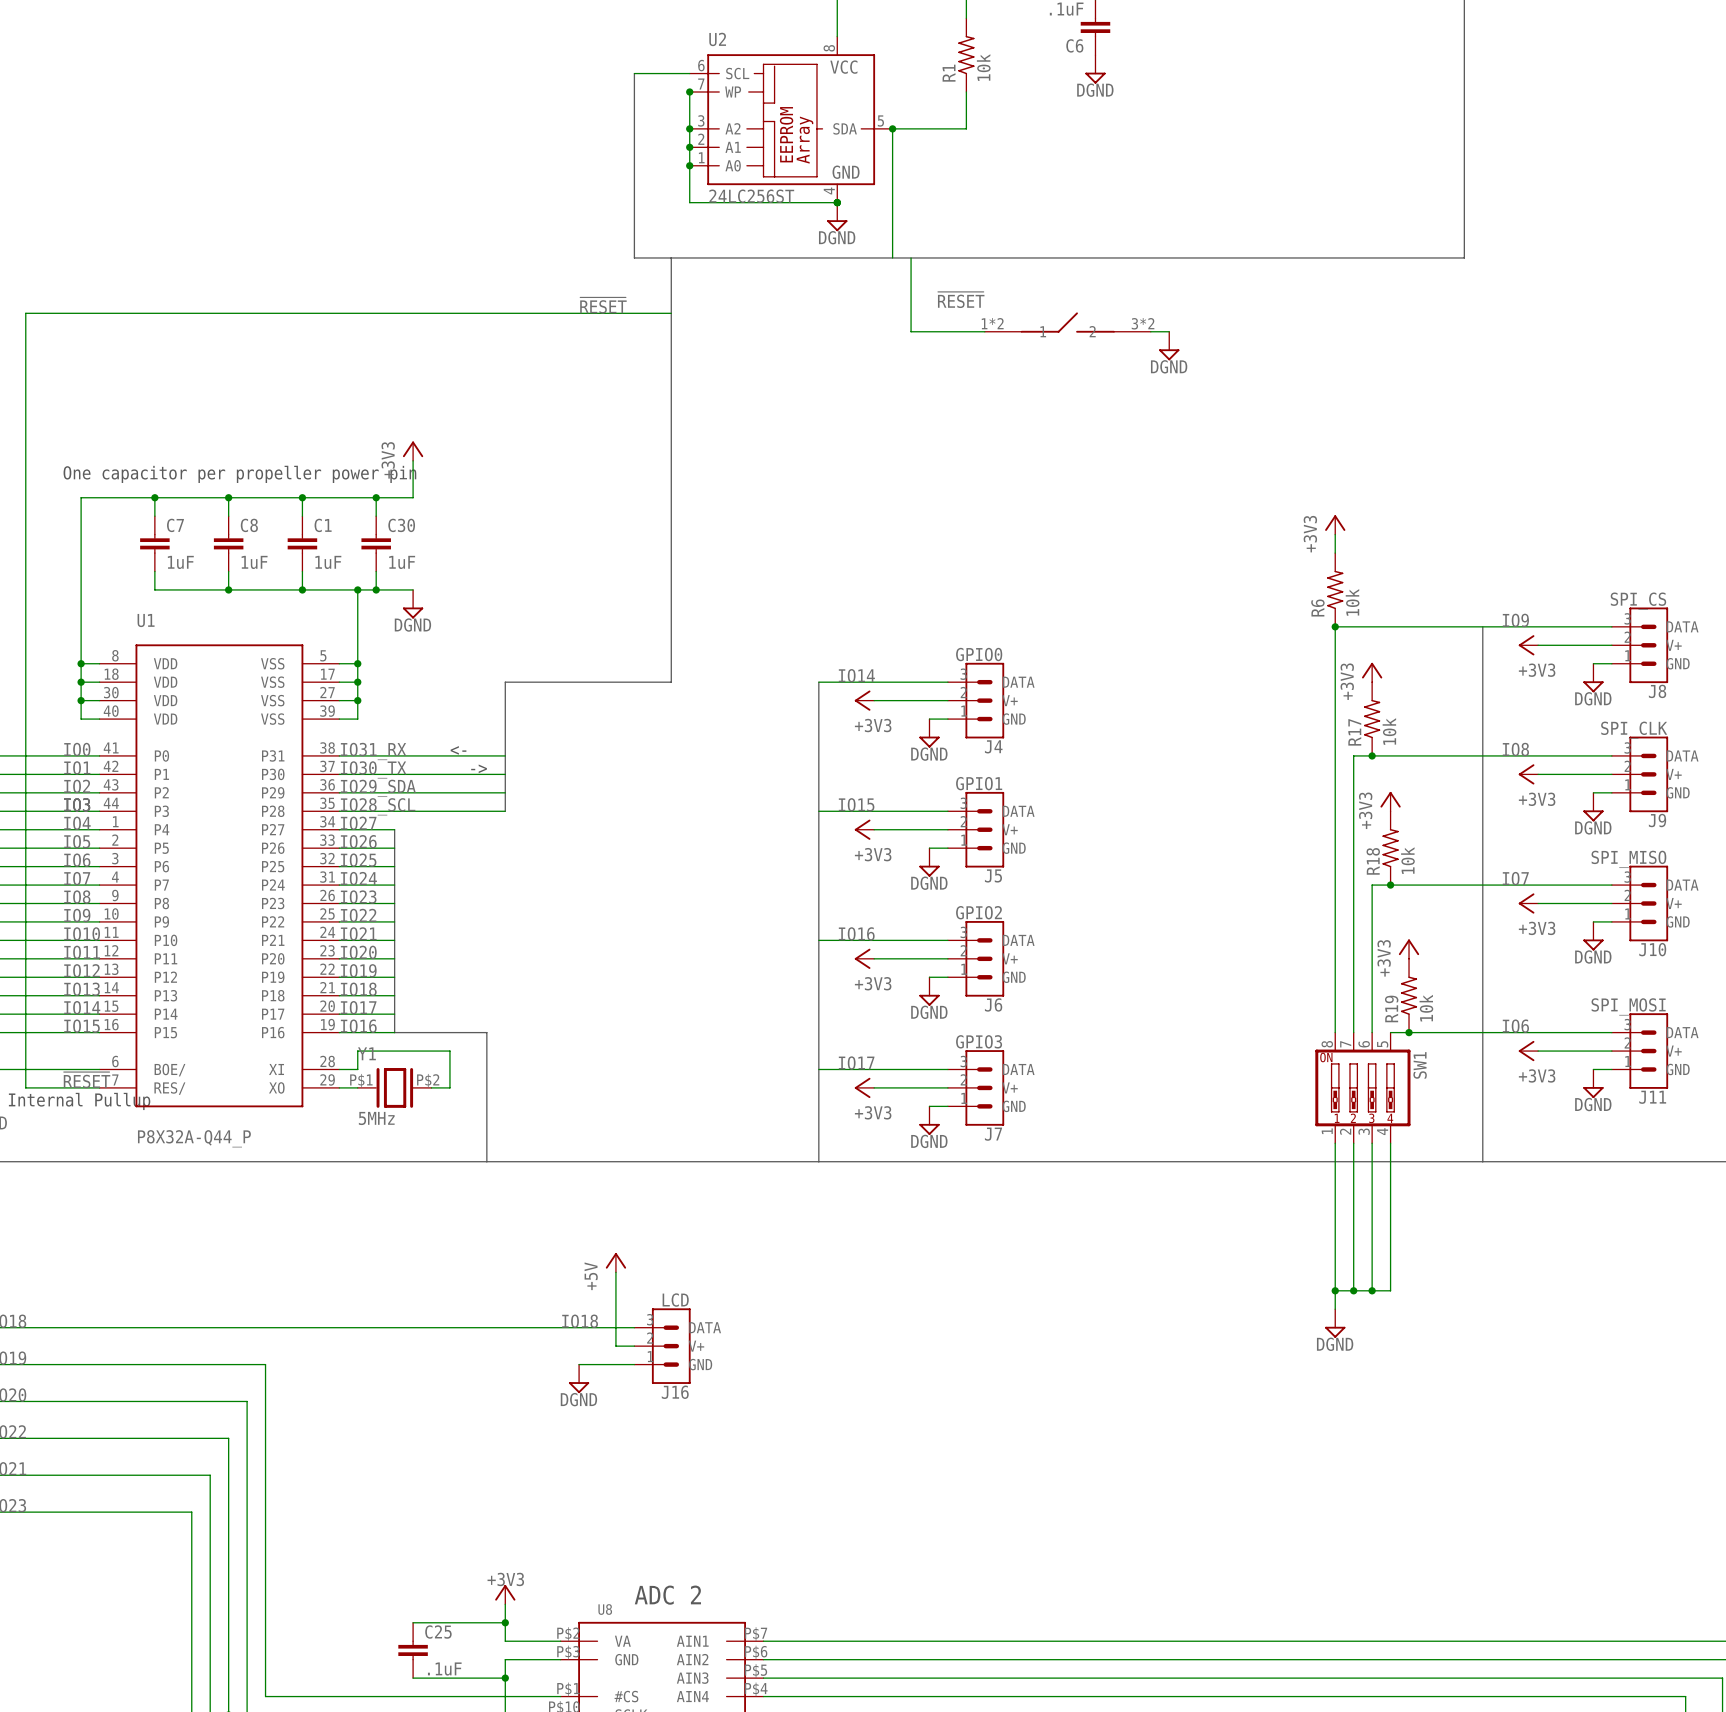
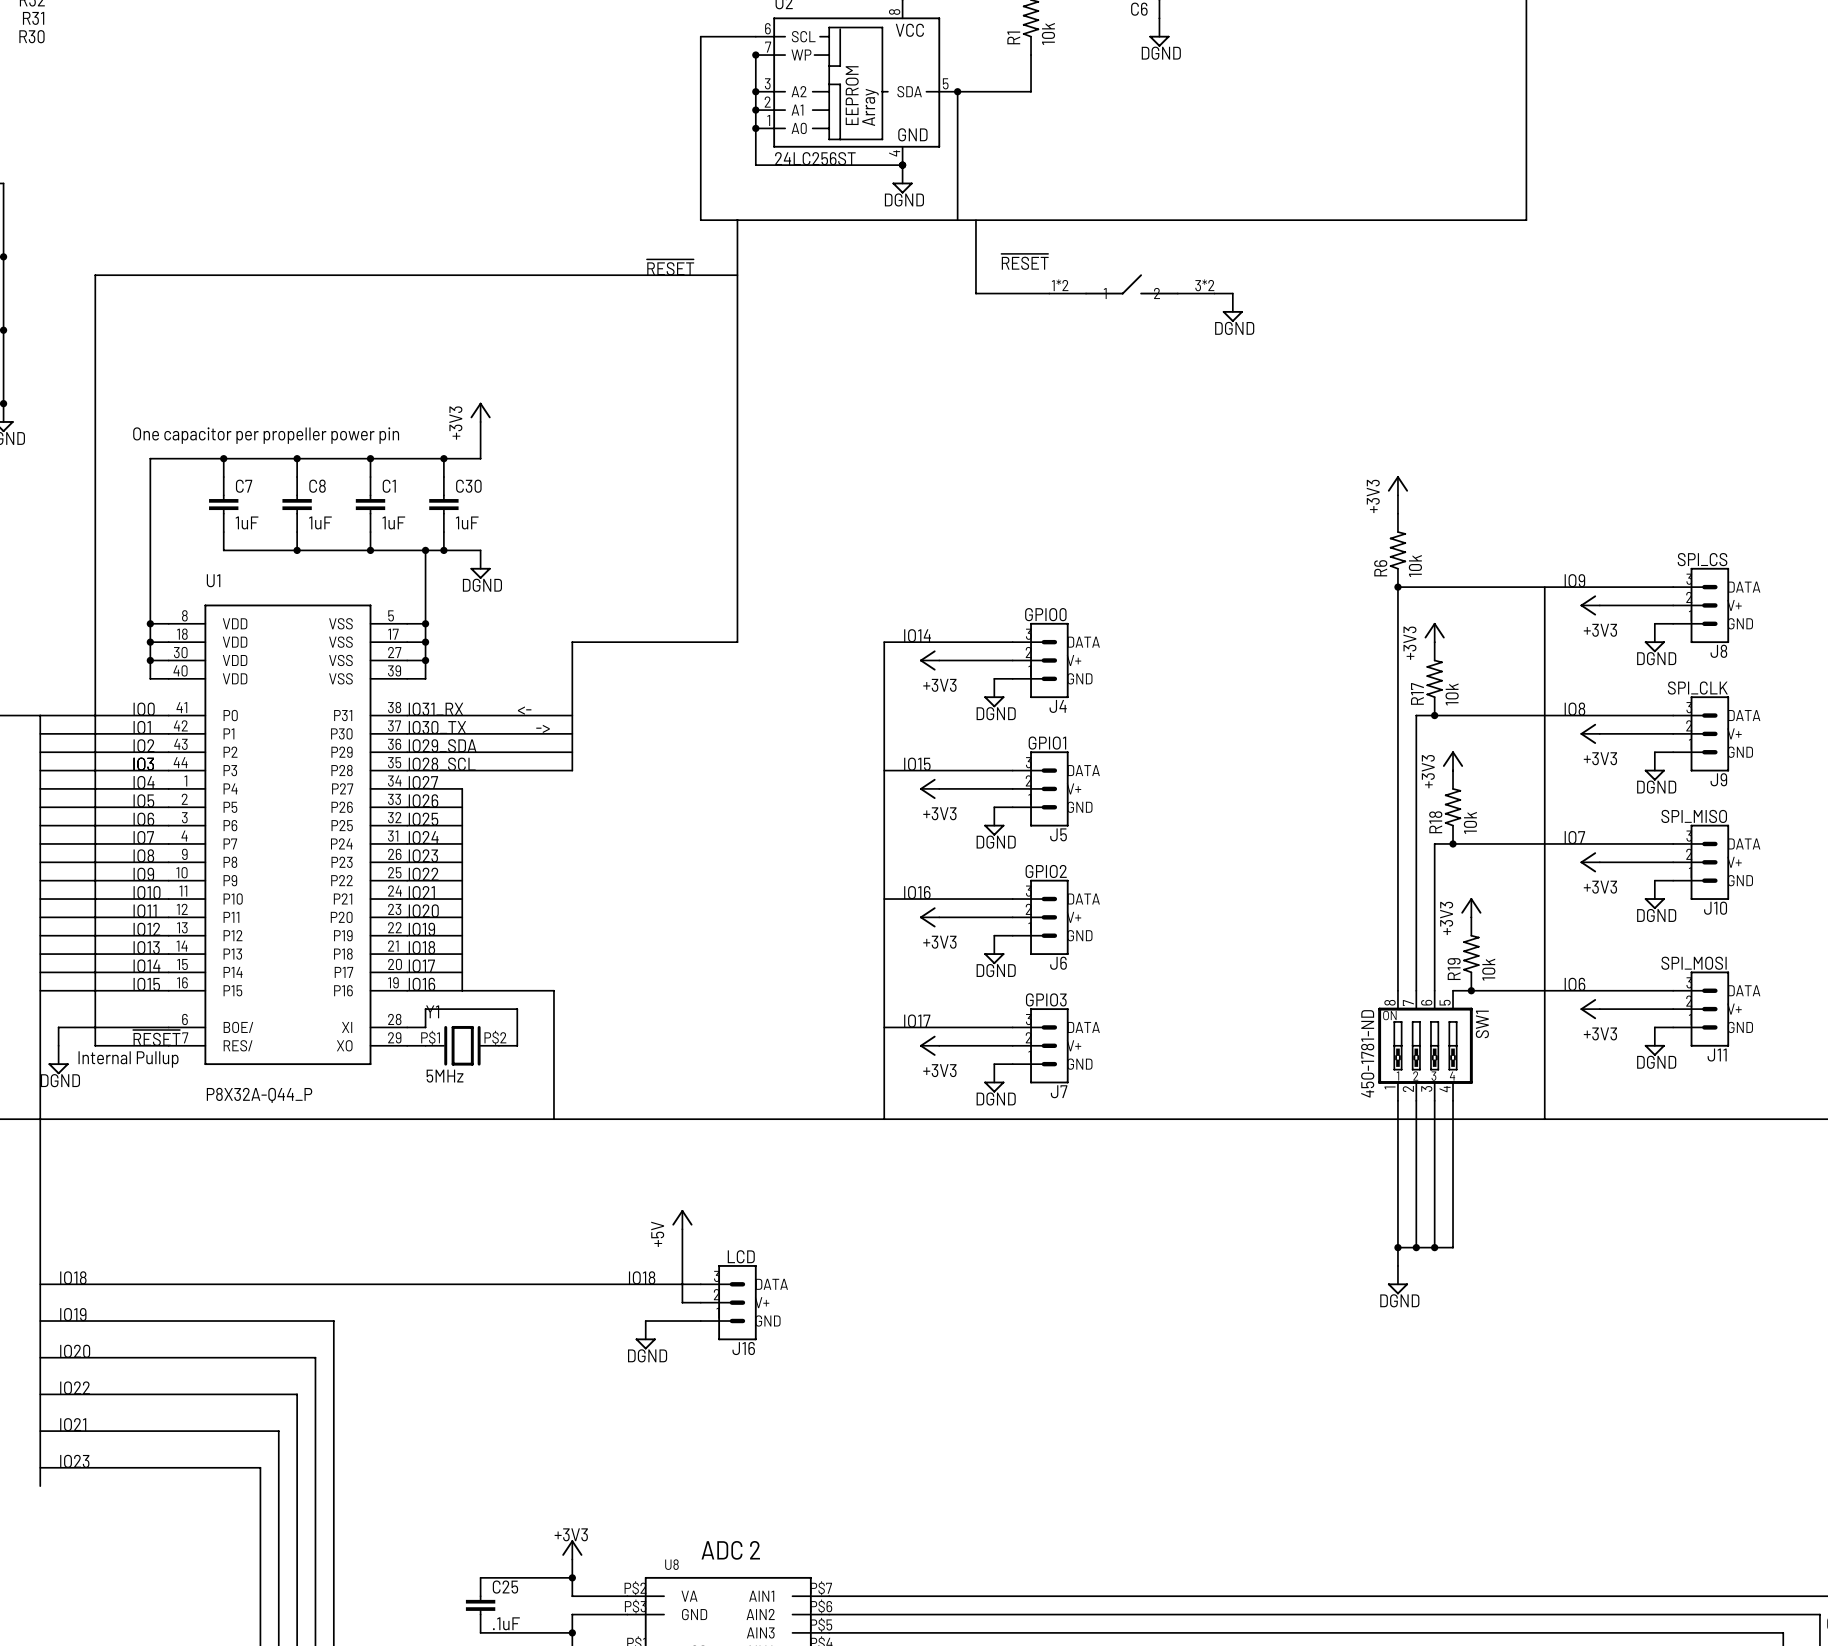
SW1 value: none -> 450-1781-ND (1367, 1053)

